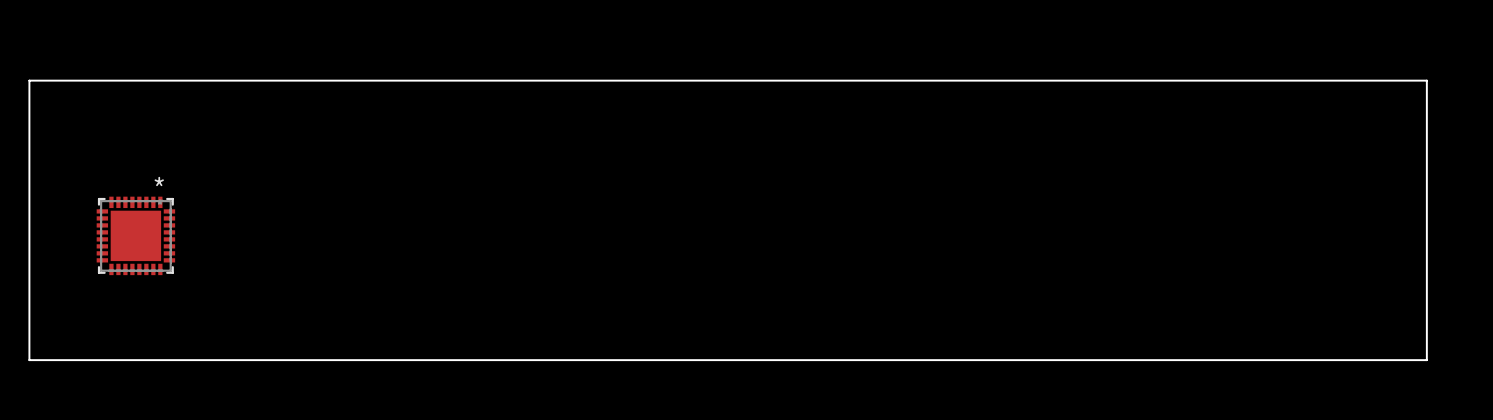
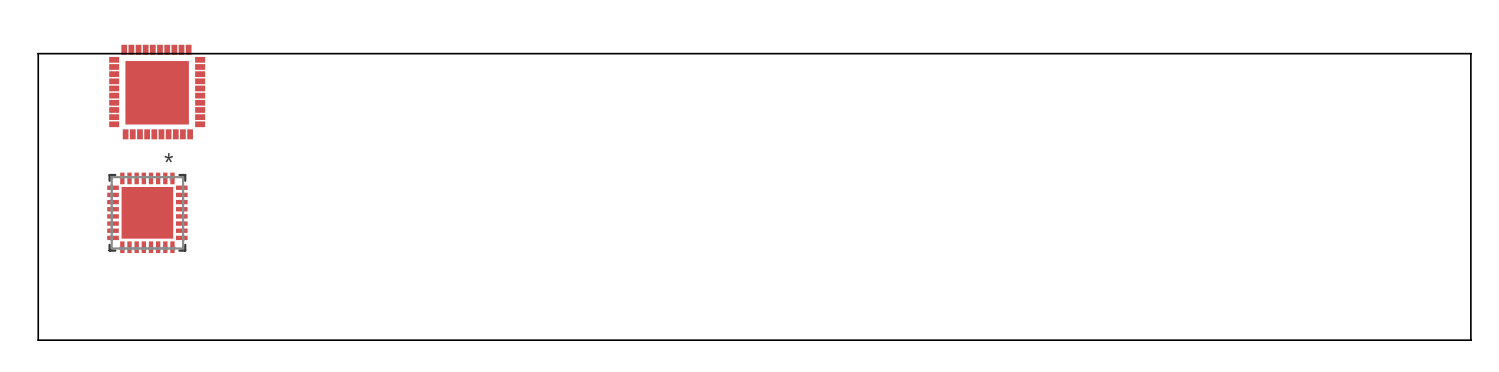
part: none -> (157, 92)

